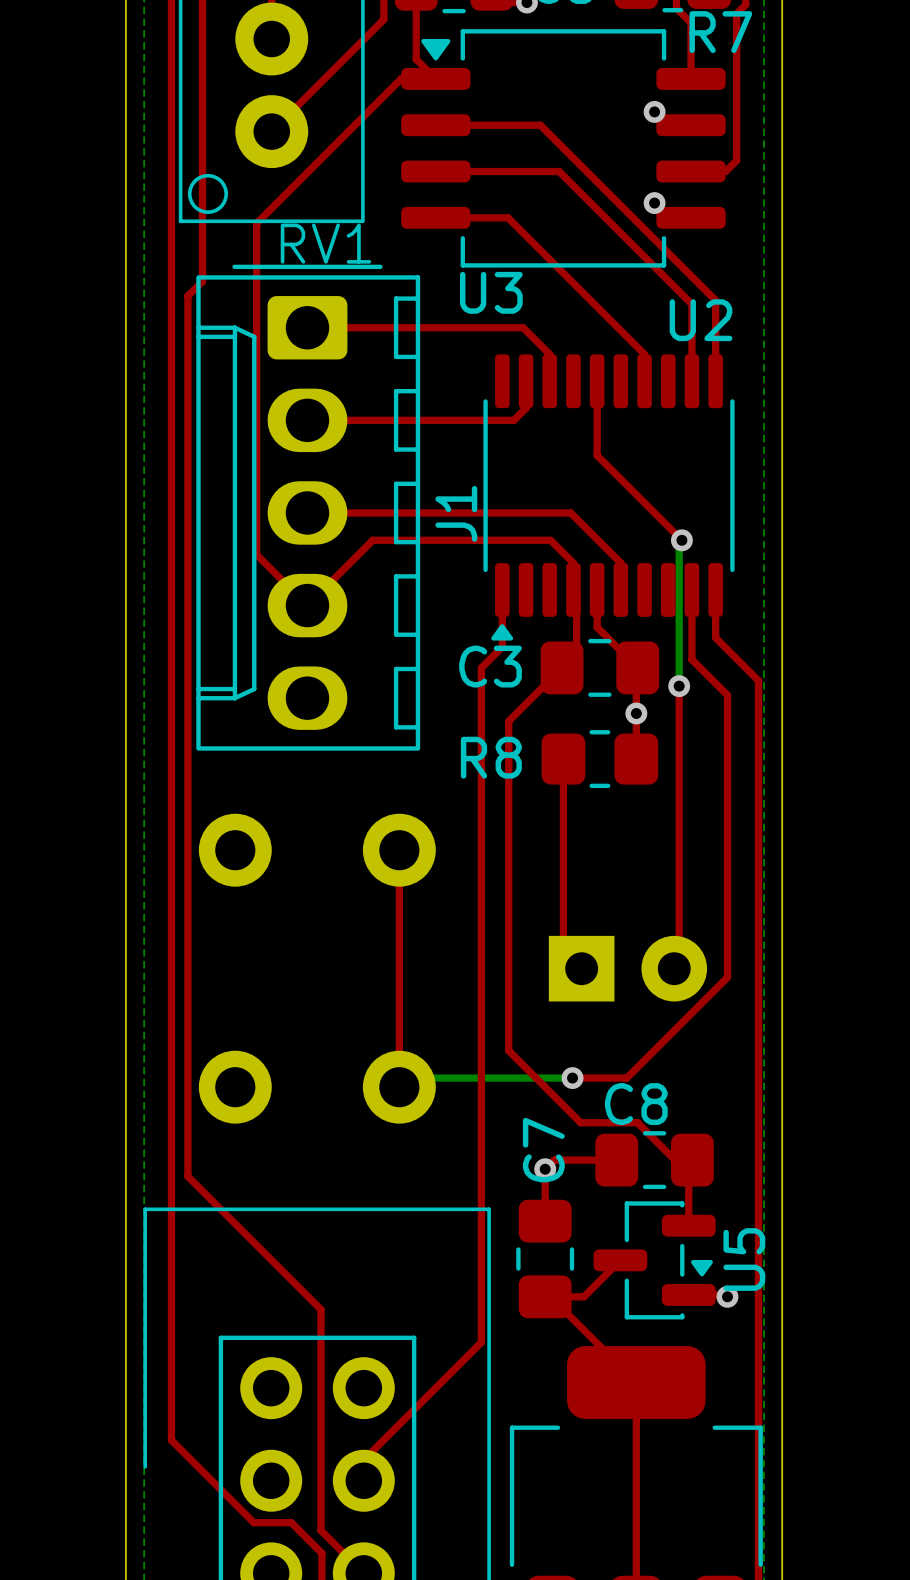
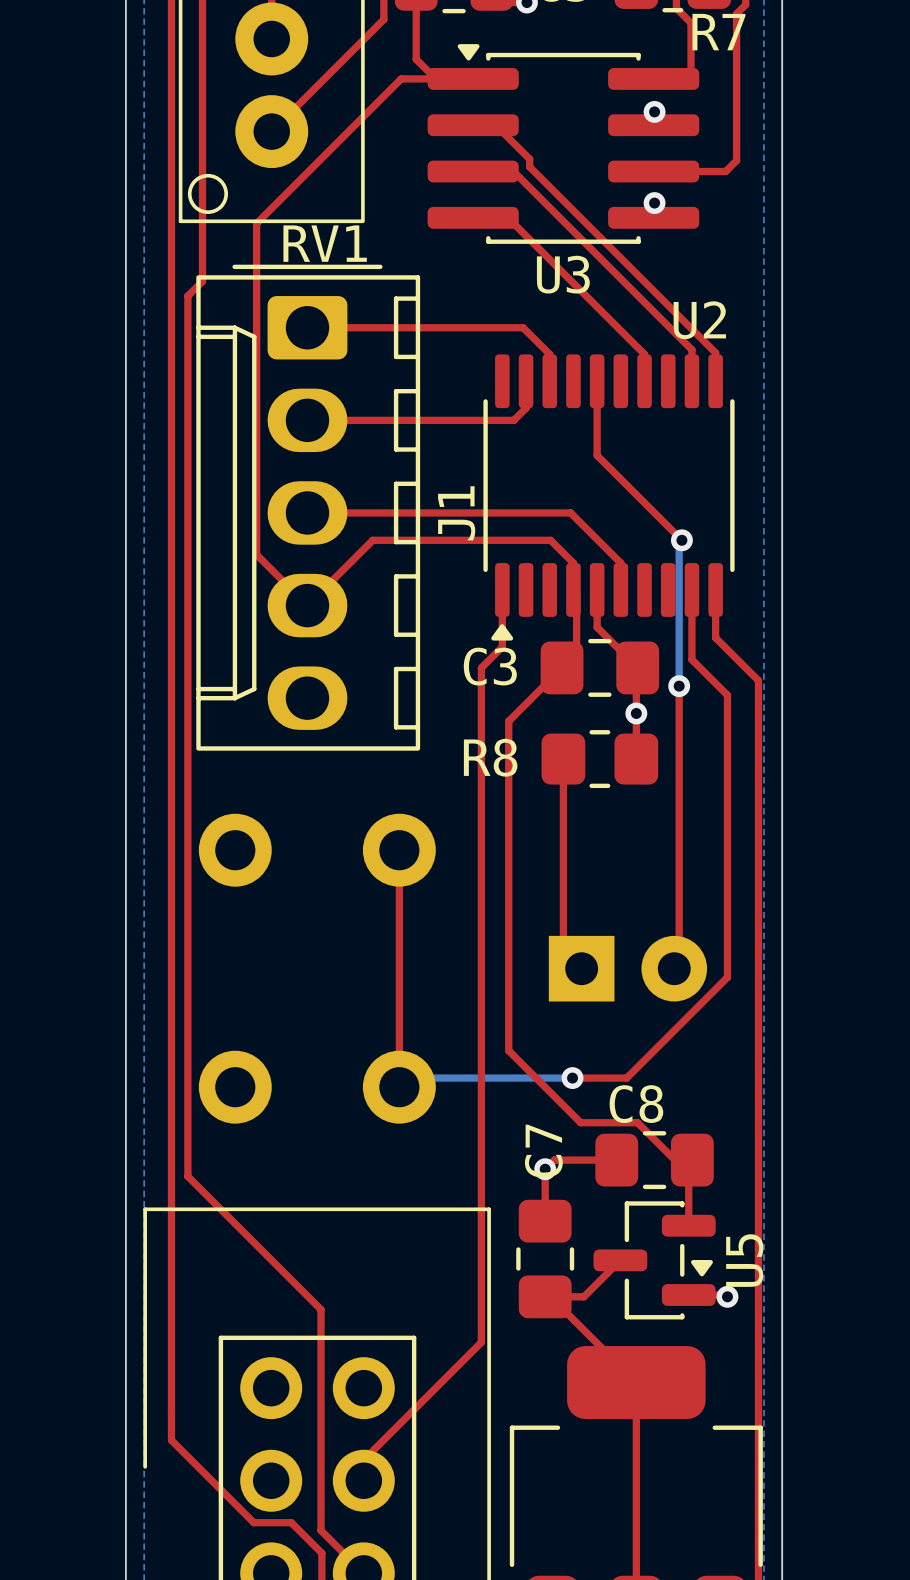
U3 footprint: [401, 29, 726, 268] -> [427, 44, 700, 244]
top track: (495, 125) (540, 125) (715, 300) (715, 352) -> (495, 125) (529, 159) (529, 166) (715, 352)
top track: (513, 171) (559, 171) (691, 304) (691, 349) -> (513, 171) (691, 349)
U3 name position: U3 (491, 292) -> U3 (563, 274)

